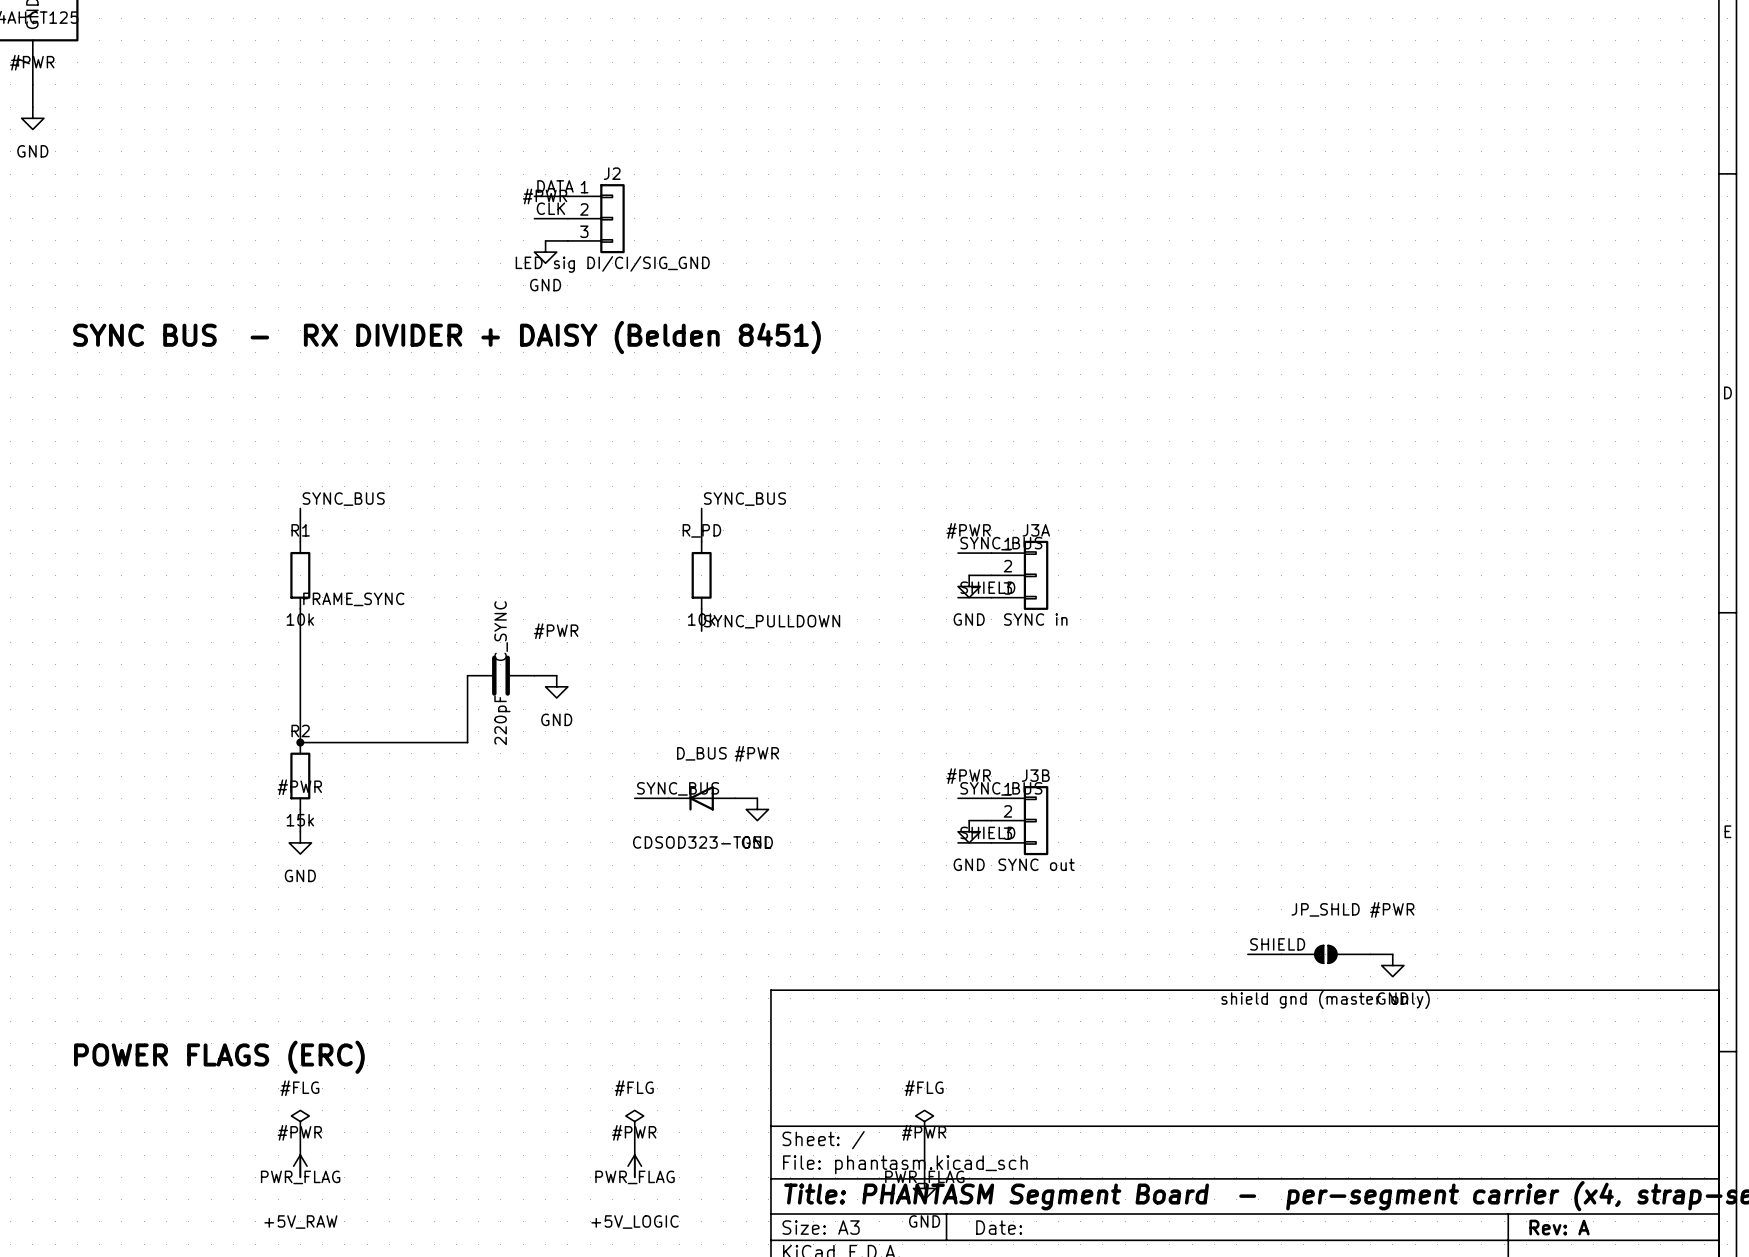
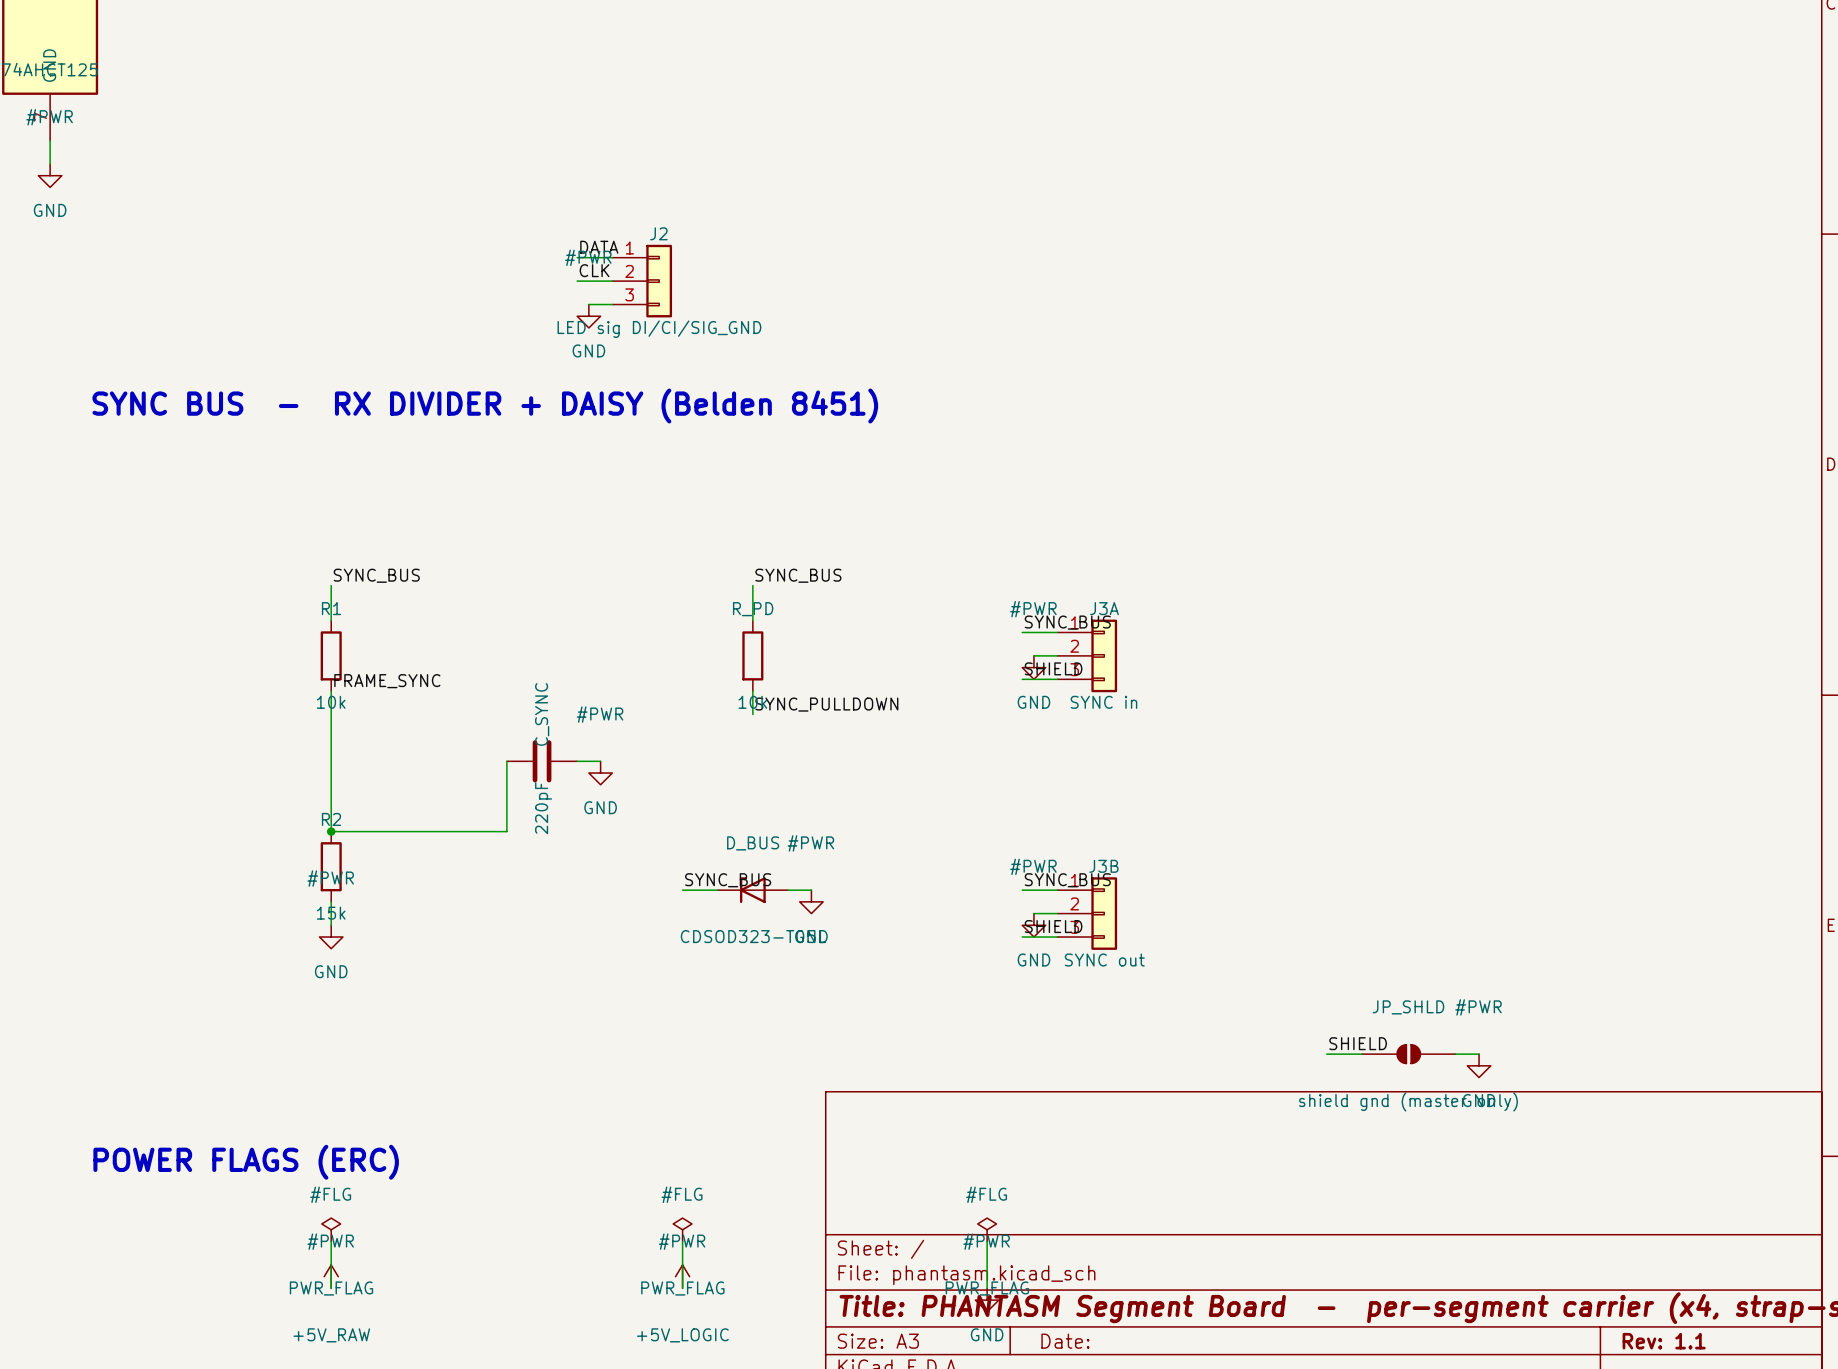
title block: Rev: A (1559, 1227) -> Rev: 1.1 (1664, 1341)

